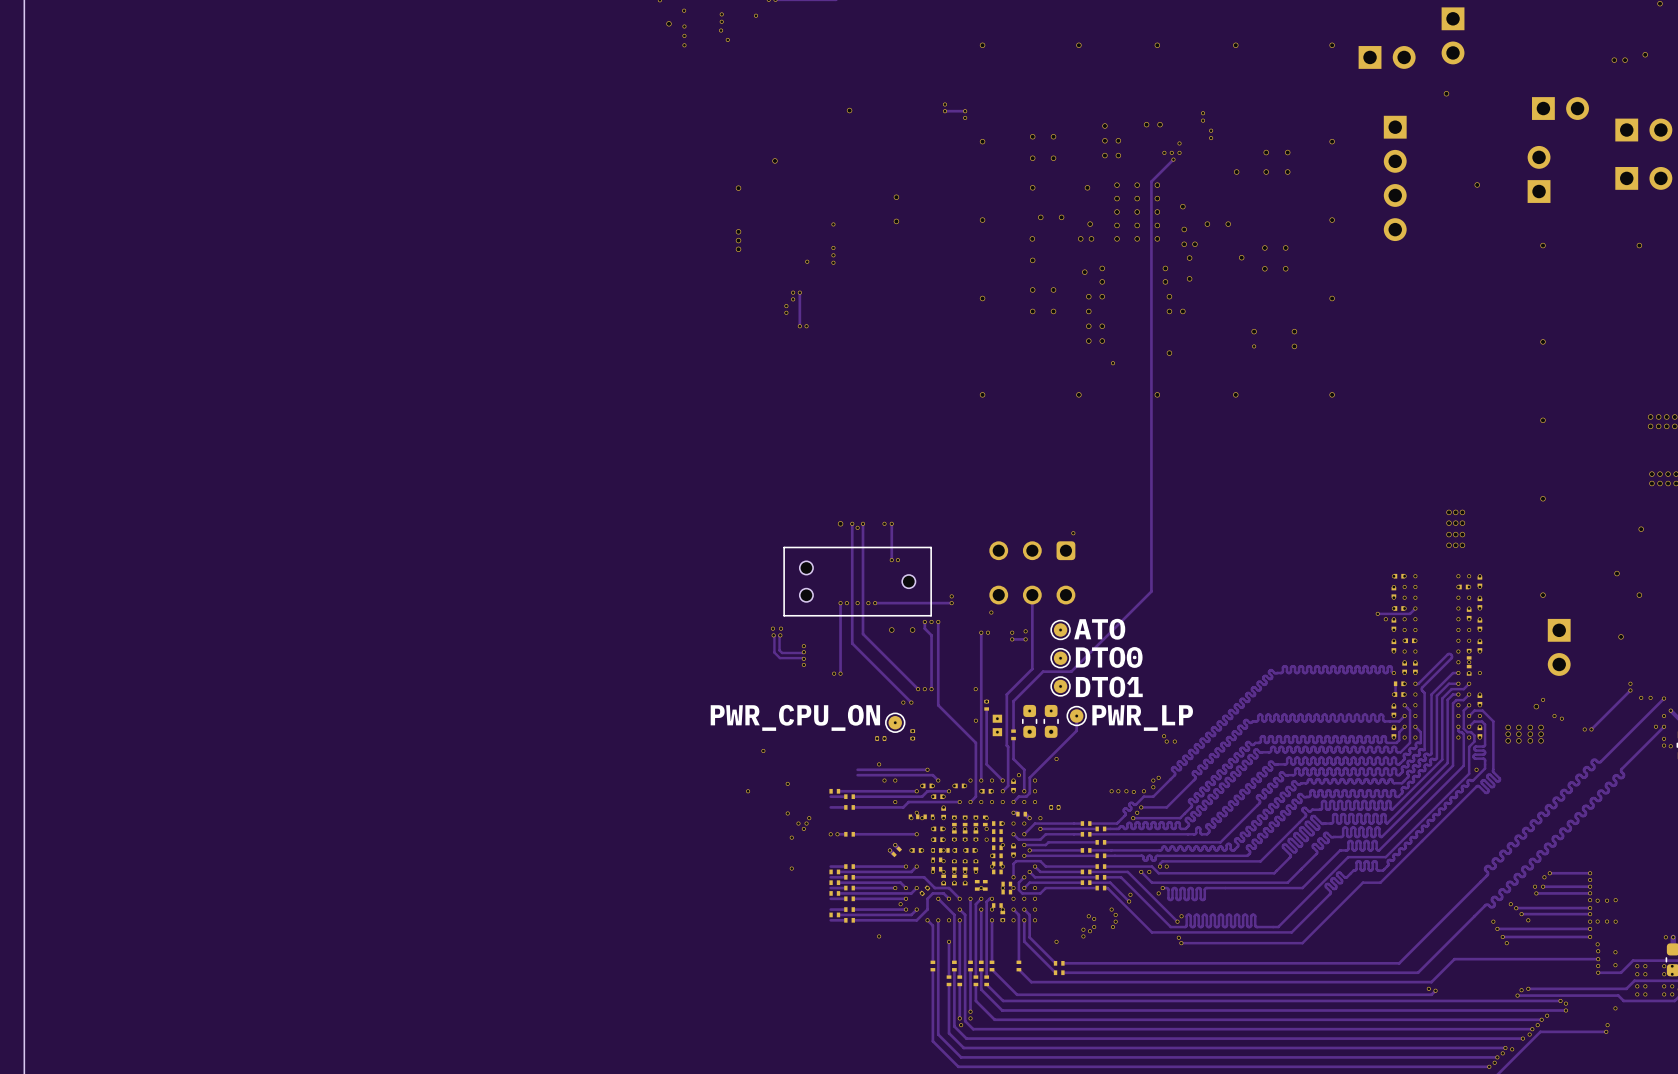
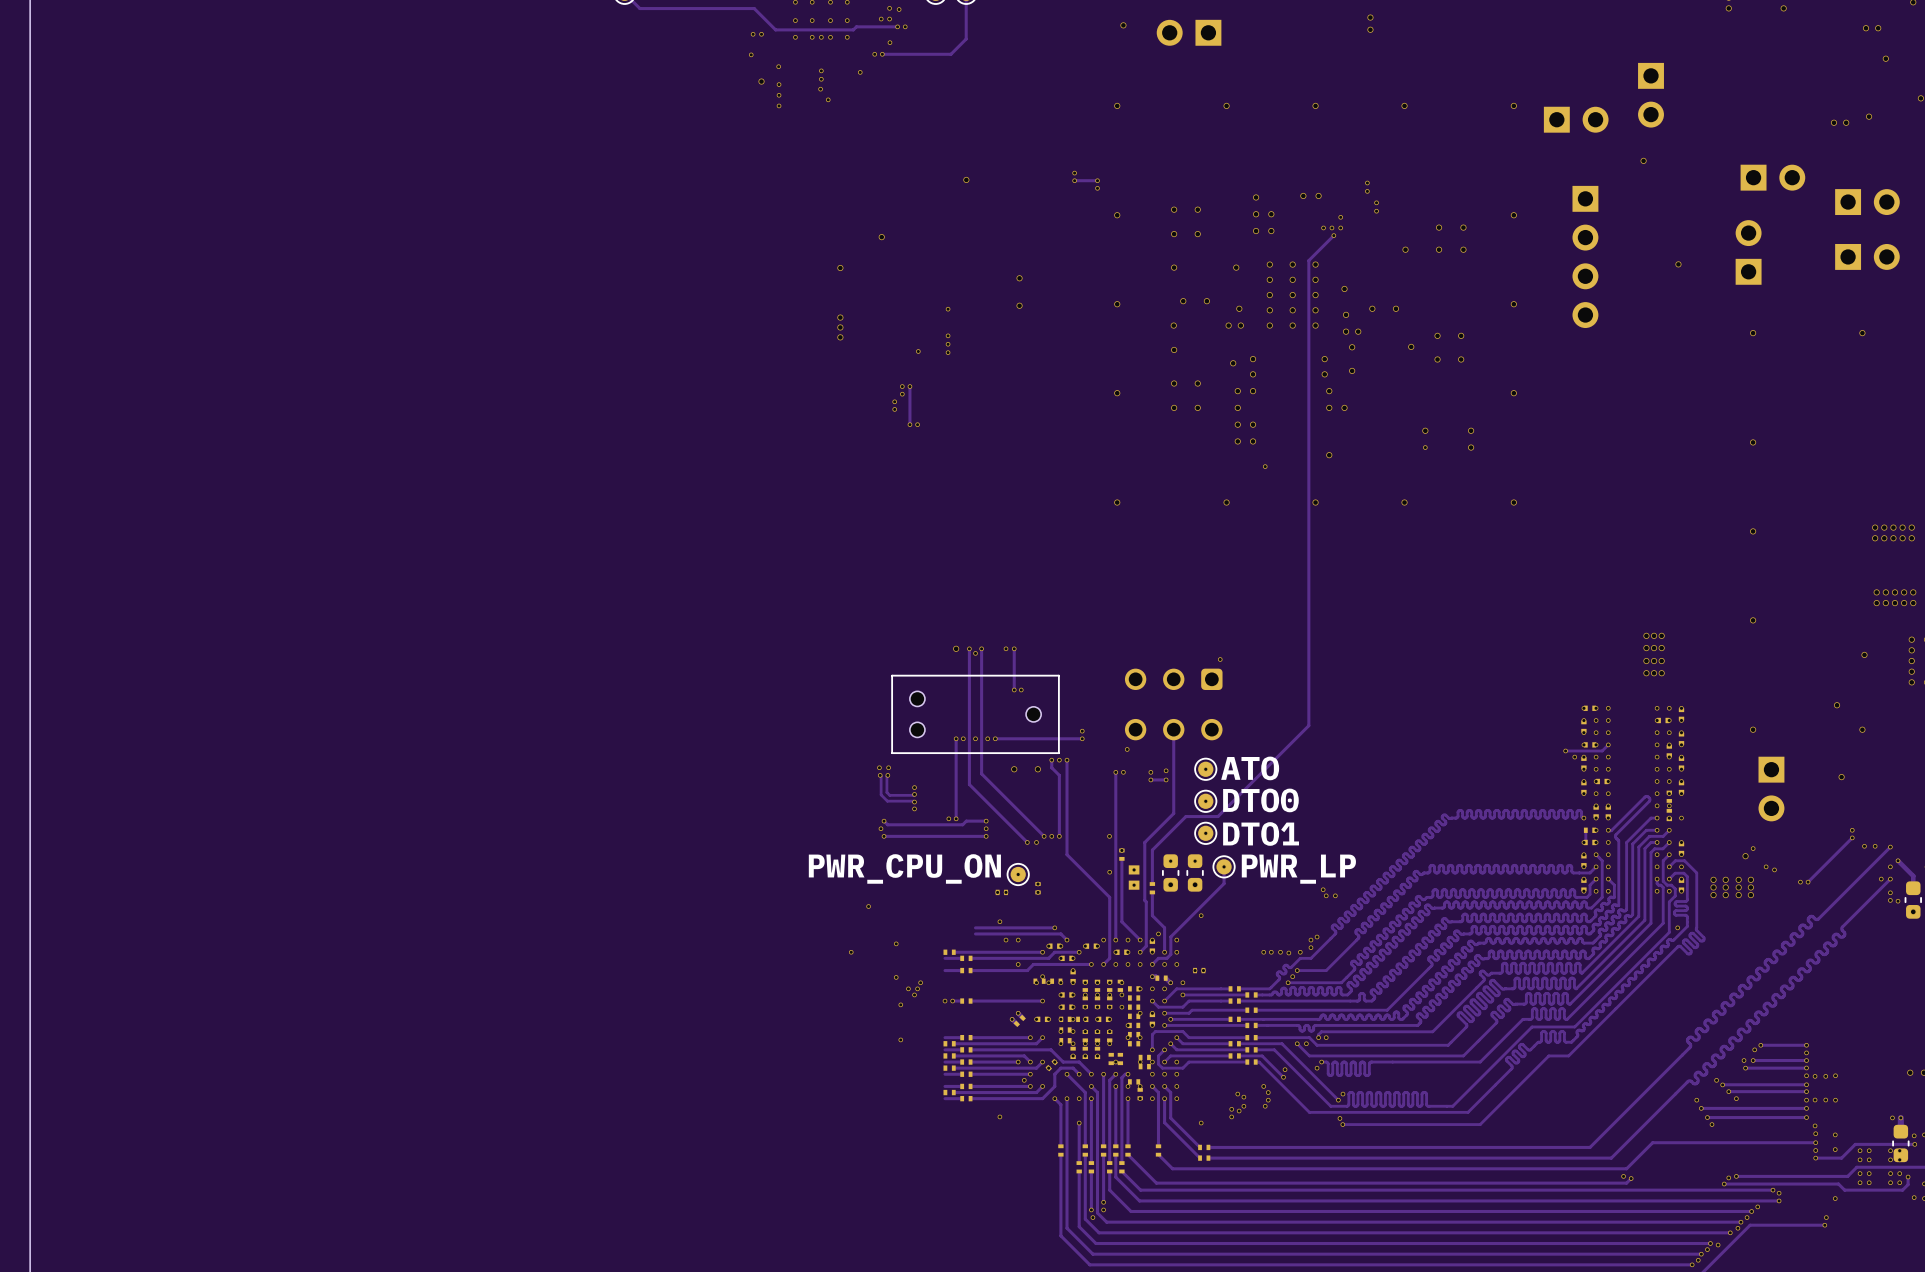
via: none -> (884, 821)
track: none -> (986, 821) (966, 821) (962, 824) (887, 824) (884, 821)
via: none -> (986, 821)
via: none -> (880, 828)
via: none -> (986, 828)
via: none -> (884, 836)
track: none -> (986, 836) (884, 836)
via: none -> (986, 836)
track: (903, 694) (911, 702) -> none
via: none -> (1027, 842)
via: none -> (1036, 842)
via: (903, 702) -> none
via: (911, 702) -> none

